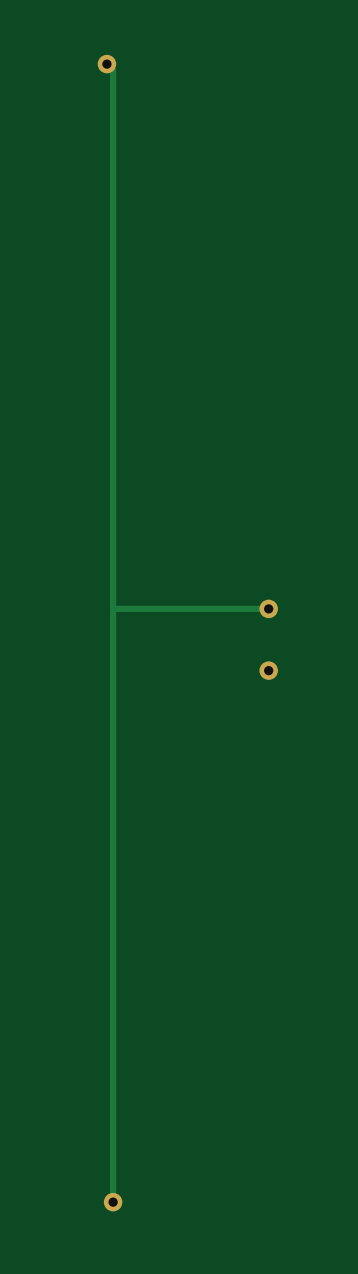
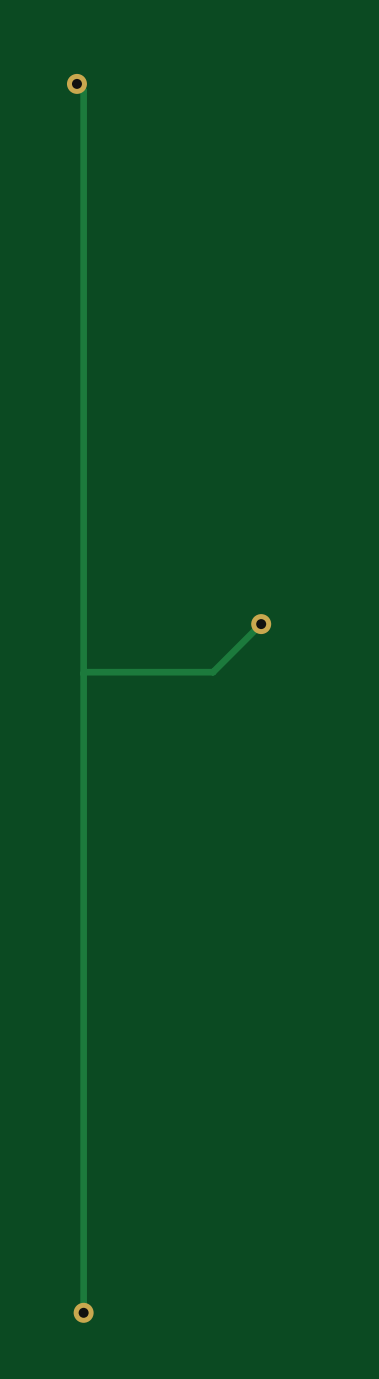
track: (268, 608) (232, 608) -> (261, 624) (213, 672)
via position: (268, 608) -> (261, 624)
via: (268, 670) -> none

